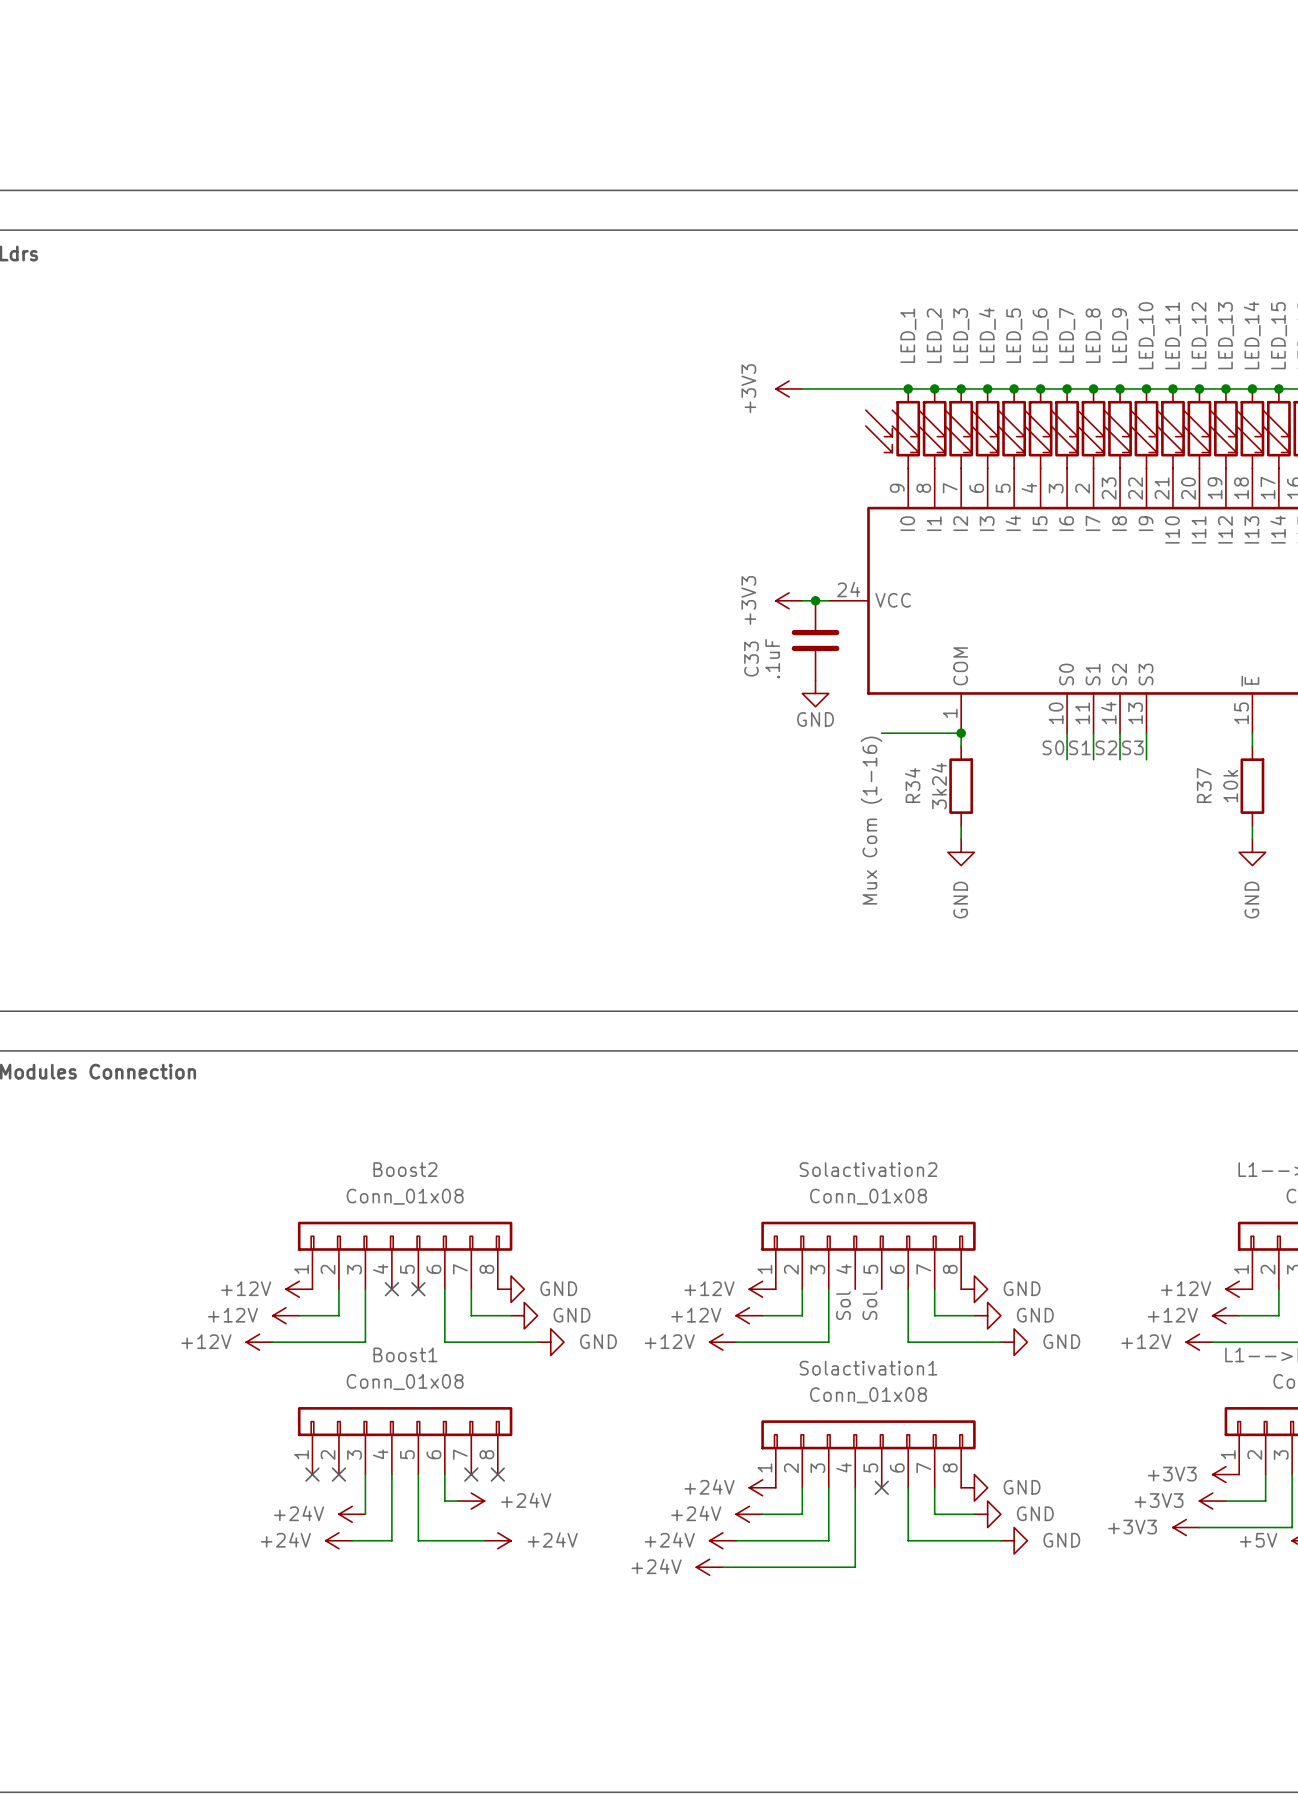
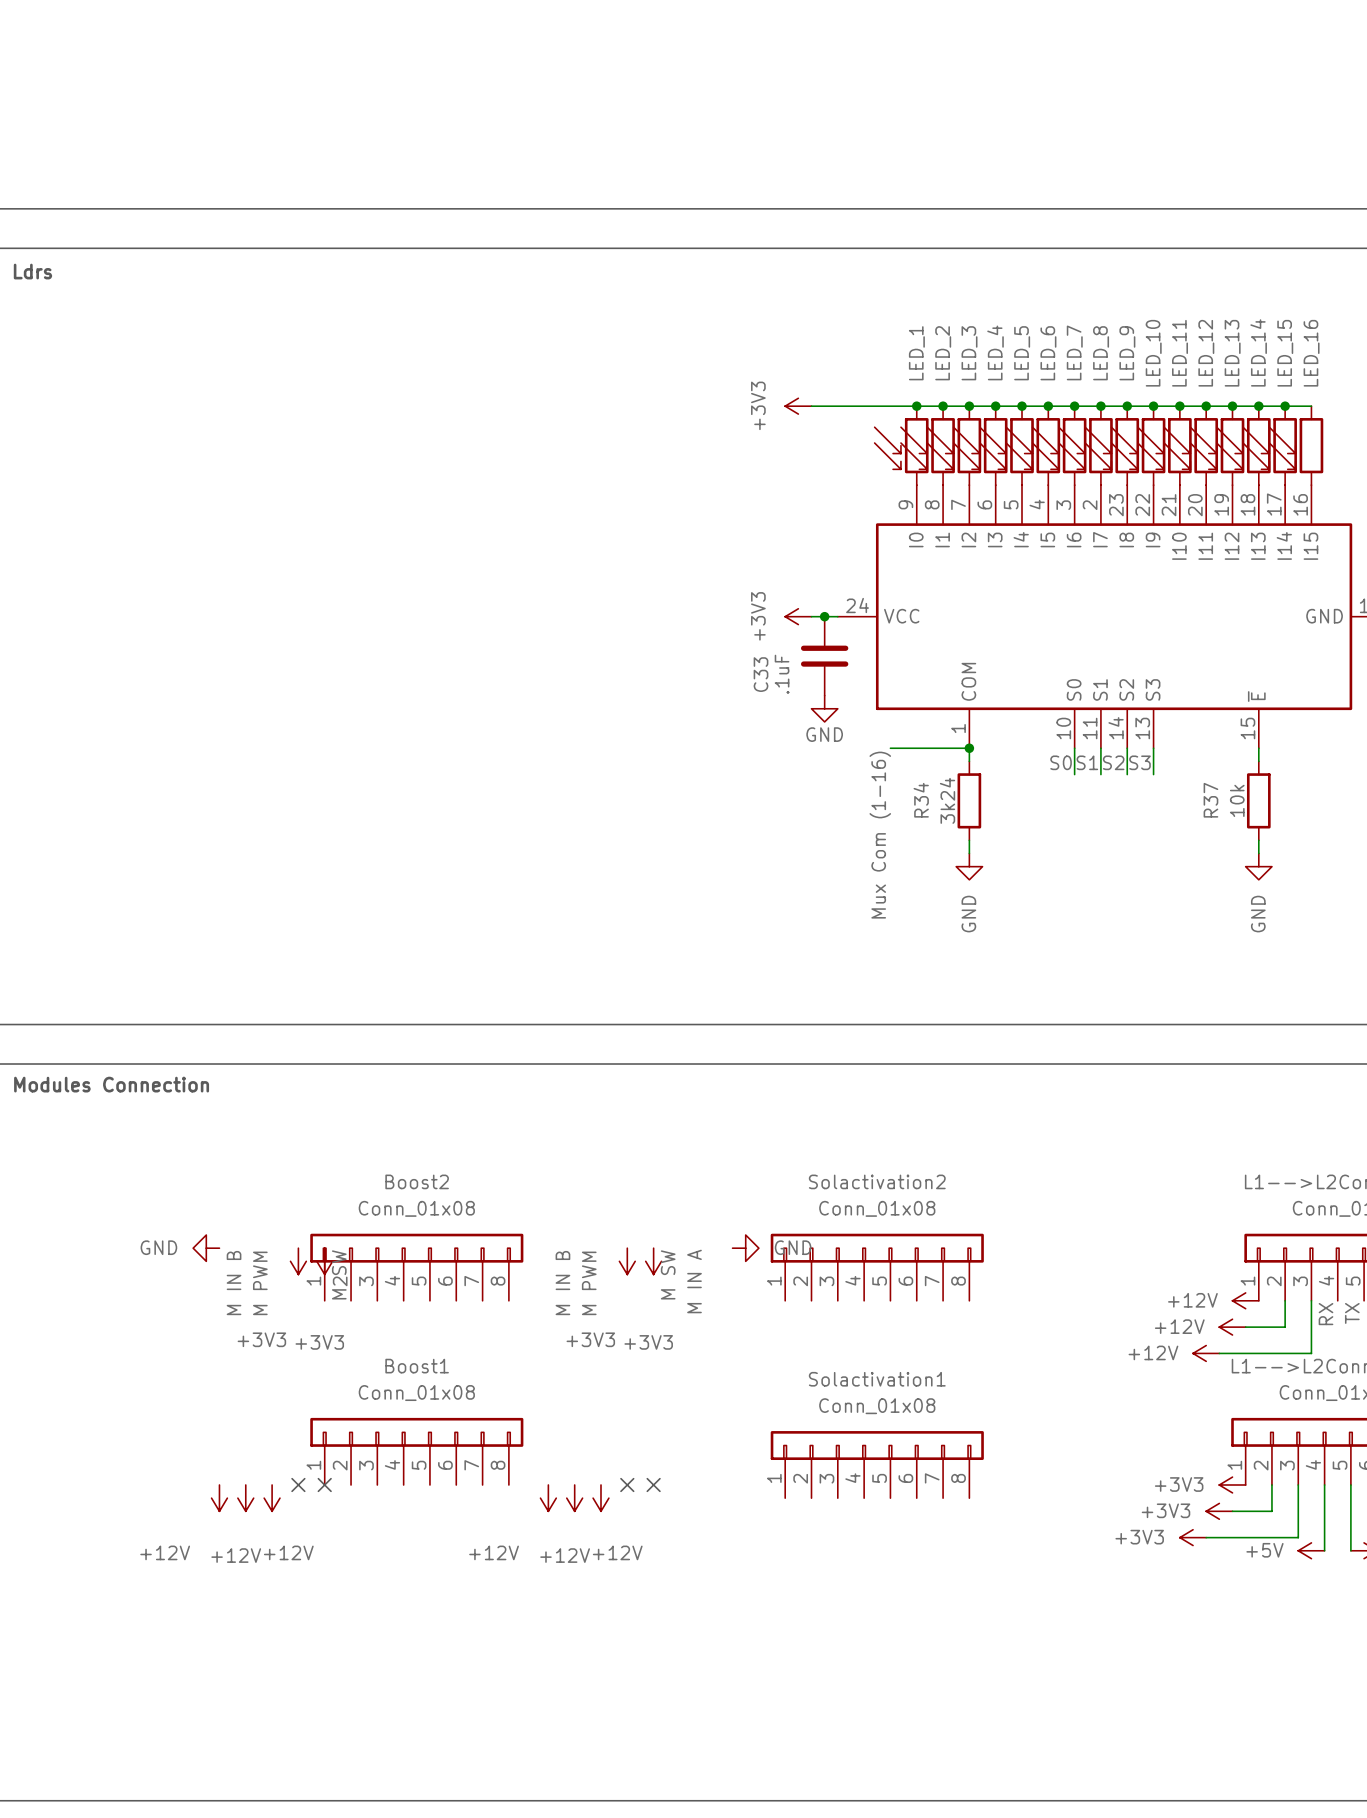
power symbol: none -> GND (206, 1248)
power symbol: none -> GND (745, 1248)
power symbol: none -> +3V3 (298, 1261)
power symbol: none -> +3V3 (324, 1261)
power symbol: none -> +3V3 (627, 1261)
power symbol: none -> +3V3 (653, 1261)
label: none -> M SW (339, 1274)
label: none -> M SW (668, 1274)
label: none -> M IN A (694, 1281)
label: none -> M IN B (234, 1283)
label: none -> M PWM (260, 1283)
label: none -> M IN B (562, 1283)
label: none -> M PWM (589, 1283)
power symbol: +12V (299, 1289) -> none
wire: (338, 1289) (338, 1315) (299, 1315) -> none
wire: (365, 1289) (365, 1342) (272, 1342) -> none
no-connect mark: (391, 1289) -> none
no-connect mark: (418, 1289) -> none
wire: (444, 1289) (444, 1342) (537, 1342) -> none
wire: (471, 1289) (471, 1315) (511, 1315) -> none
power symbol: GND (511, 1289) -> none
power symbol: +12V (762, 1289) -> none
wire: (802, 1289) (802, 1315) (762, 1315) -> none
wire: (828, 1289) (828, 1342) (736, 1342) -> none
wire: (908, 1289) (908, 1342) (1000, 1342) -> none
wire: (934, 1289) (934, 1315) (974, 1315) -> none
power symbol: GND (974, 1289) -> none
label: Sol (843, 1305) -> none
label: Sol (869, 1305) -> none
power symbol: +12V (285, 1315) -> none
power symbol: GND (524, 1315) -> none
power symbol: +12V (749, 1315) -> none
power symbol: GND (987, 1315) -> none
power symbol: +12V (259, 1342) -> none
power symbol: GND (550, 1342) -> none
power symbol: +12V (722, 1342) -> none
power symbol: GND (1014, 1342) -> none
no-connect mark position: (338, 1474) -> (298, 1485)
wire: (365, 1474) (365, 1514) -> none
wire: (391, 1474) (391, 1540) (352, 1540) -> none
wire: (418, 1474) (418, 1540) (484, 1540) -> none
wire: (444, 1474) (444, 1501) (458, 1501) -> none
no-connect mark: (471, 1474) -> none
no-connect mark: (497, 1474) -> none
no-connect mark: none -> (627, 1485)
no-connect mark: none -> (653, 1485)
power symbol: none -> +12V (219, 1498)
power symbol: none -> +12V (245, 1498)
power symbol: none -> +12V (272, 1498)
power symbol: none -> +12V (548, 1498)
power symbol: none -> +12V (574, 1498)
power symbol: none -> +12V (600, 1498)
power symbol: +24V (762, 1487) -> none
wire: (802, 1487) (802, 1514) (762, 1514) -> none
wire: (828, 1487) (828, 1540) (736, 1540) -> none
wire: (855, 1487) (855, 1567) (722, 1567) -> none
no-connect mark: (881, 1487) -> none
wire: (908, 1487) (908, 1540) (1000, 1540) -> none
wire: (934, 1487) (934, 1514) (974, 1514) -> none
power symbol: GND (974, 1487) -> none
power symbol: +24V (471, 1501) -> none
power symbol: +24V (352, 1514) -> none
power symbol: +24V (749, 1514) -> none
power symbol: GND (987, 1514) -> none
power symbol: +24V (338, 1540) -> none
power symbol: +24V (497, 1540) -> none
power symbol: +24V (722, 1540) -> none
power symbol: GND (1014, 1540) -> none
power symbol: +24V (709, 1567) -> none

